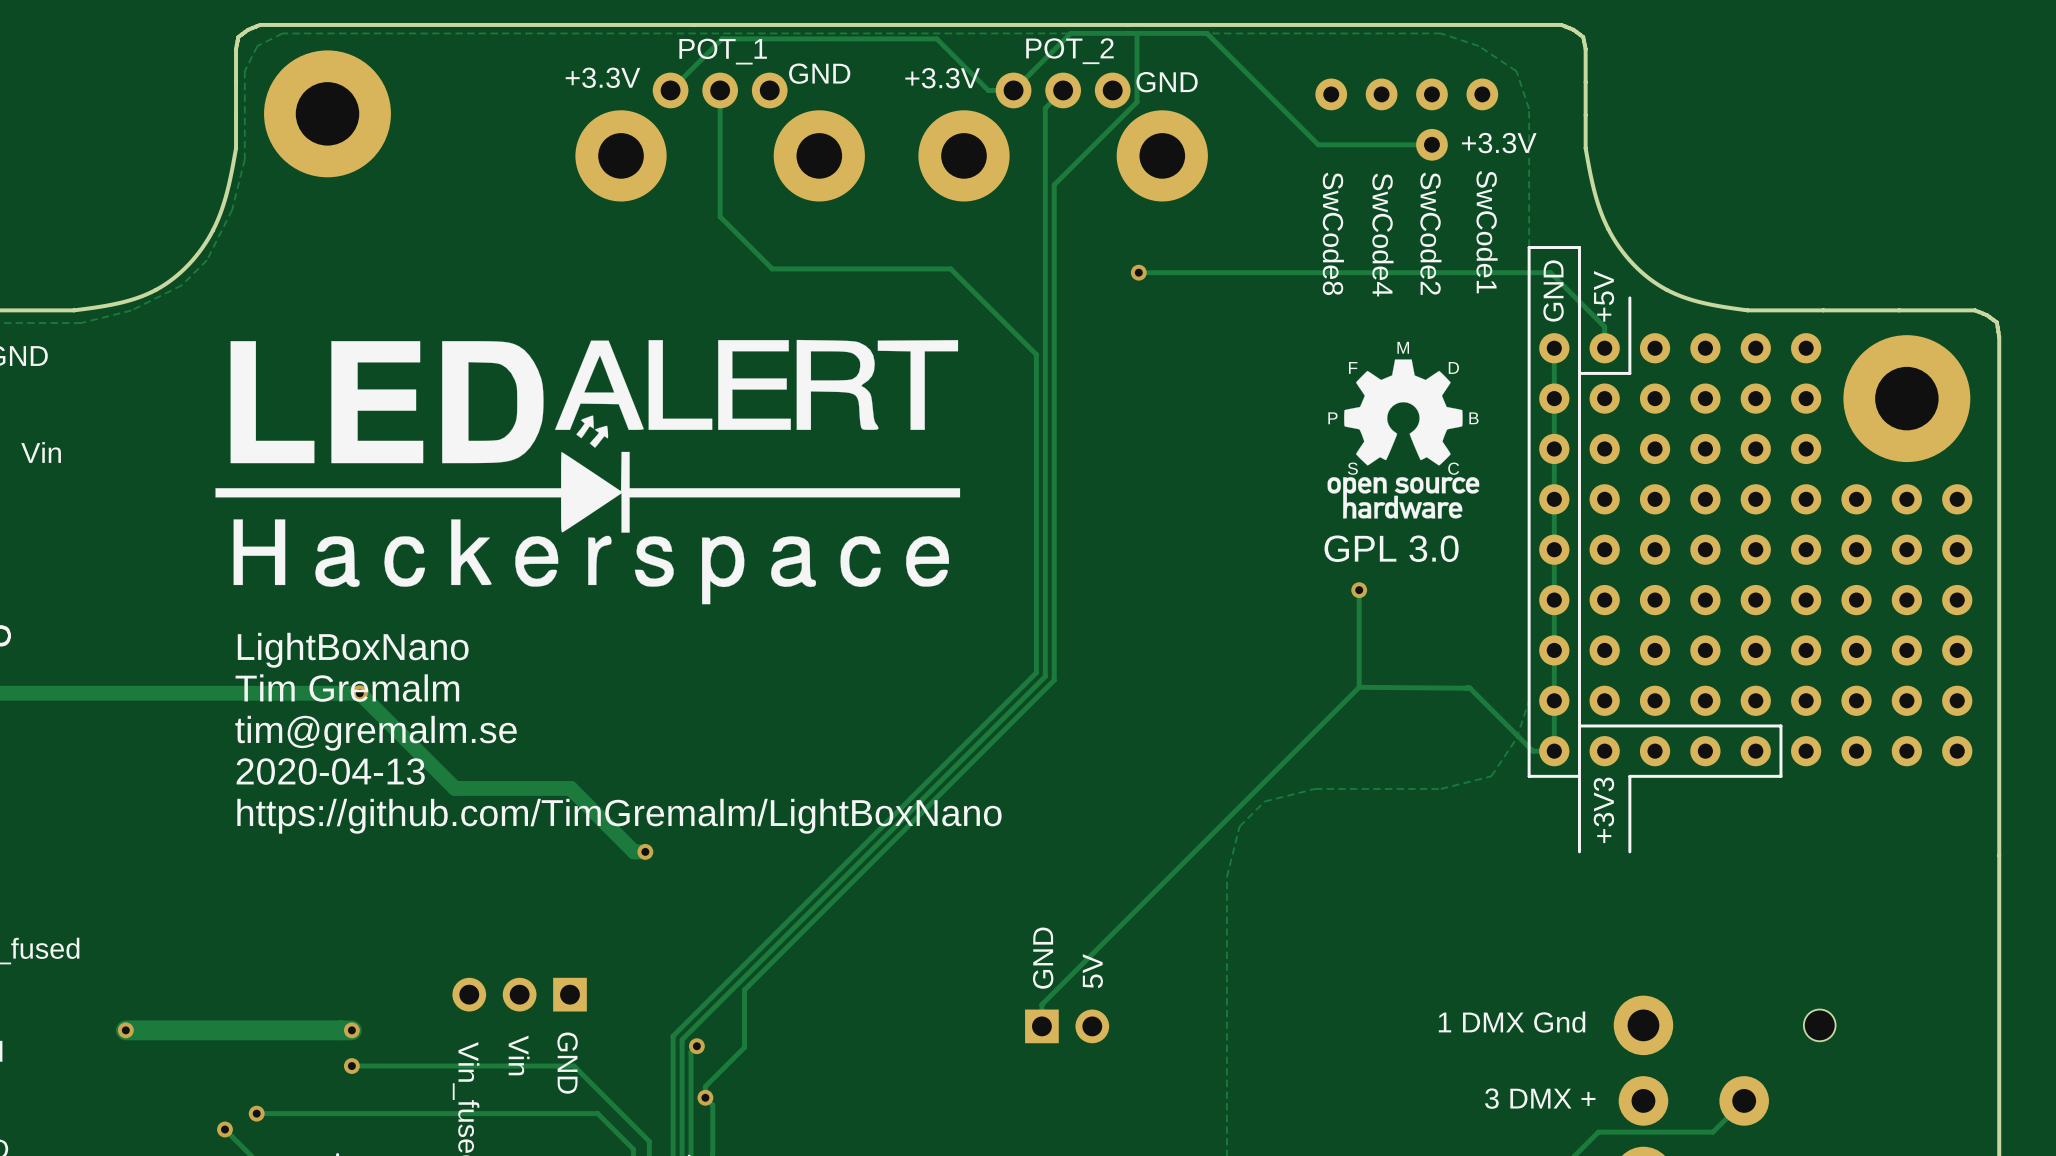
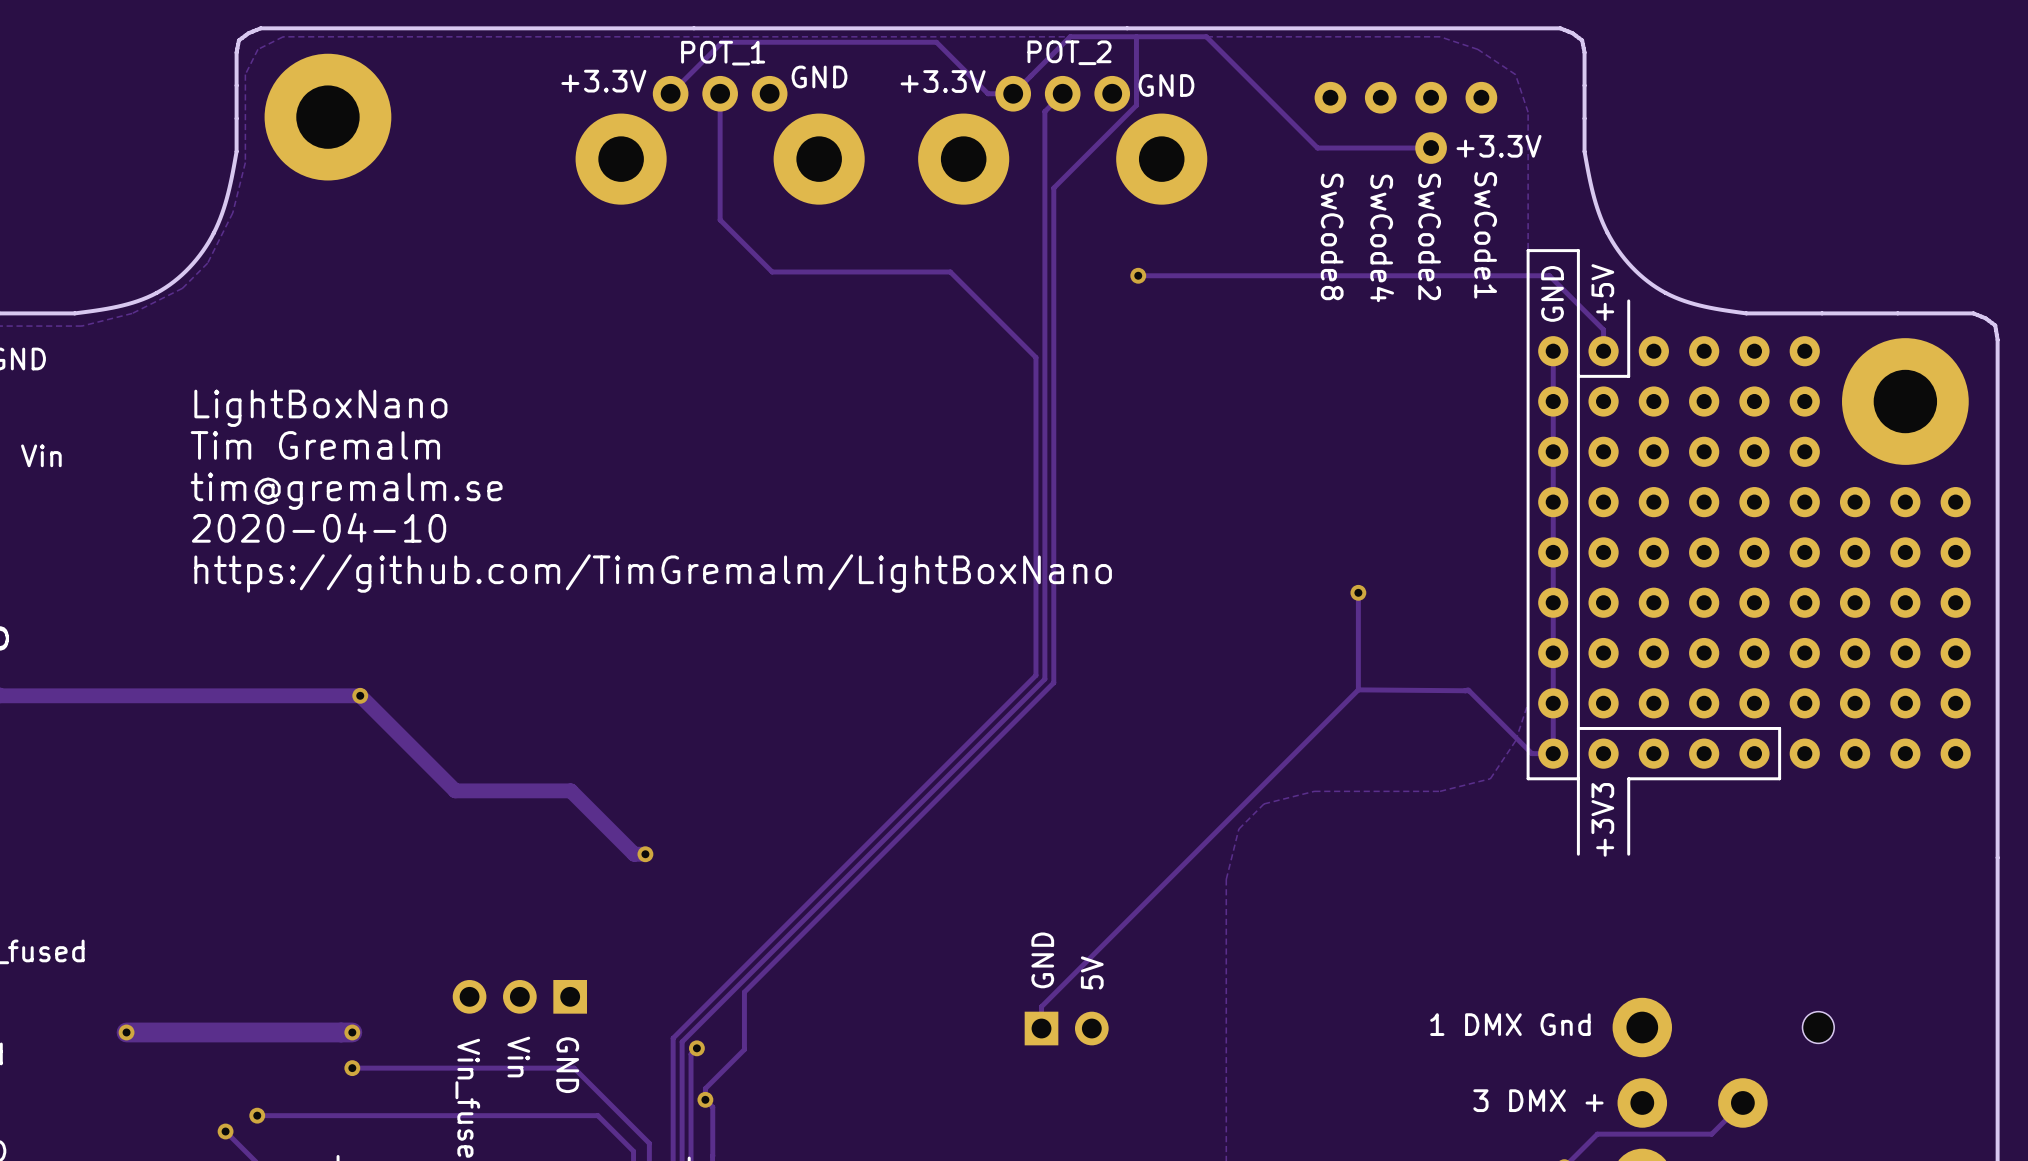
drawing: [215, 339, 961, 605] -> none
text: M (1403, 347) -> none
drawing: [1327, 359, 1480, 519] -> none
text: F (1353, 367) -> none
text: D (1453, 367) -> none
text: P (1332, 418) -> none
text: B (1473, 418) -> none
text: S (1352, 468) -> none
text: C (1453, 468) -> none
text: none -> 2020-04-10 (319, 527)
text: GPL 3.0 (1391, 548) -> none
text position: LightBoxNano (353, 650) -> LightBoxNano (320, 408)
text position: Tim Gremalm (347, 688) -> Tim Gremalm (315, 445)
text position: tim@gremalm.se (376, 733) -> tim@gremalm.se (346, 491)
text: 2020-04-13 (330, 771) -> none
text position: https://github.com/TimGremalm/LightBoxNano (619, 816) -> https://github.com/TimGremalm/LightBoxNano (653, 573)

